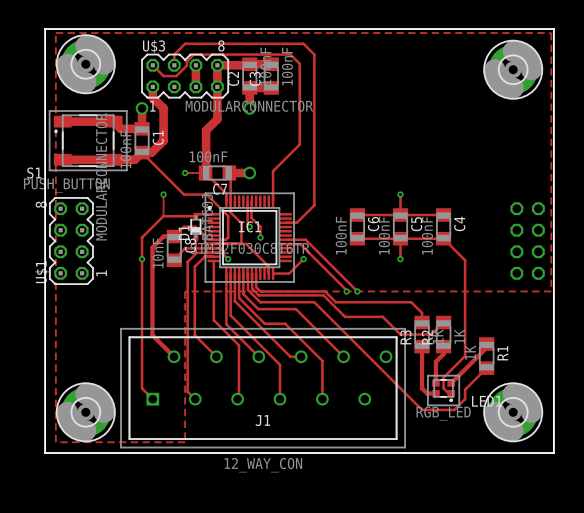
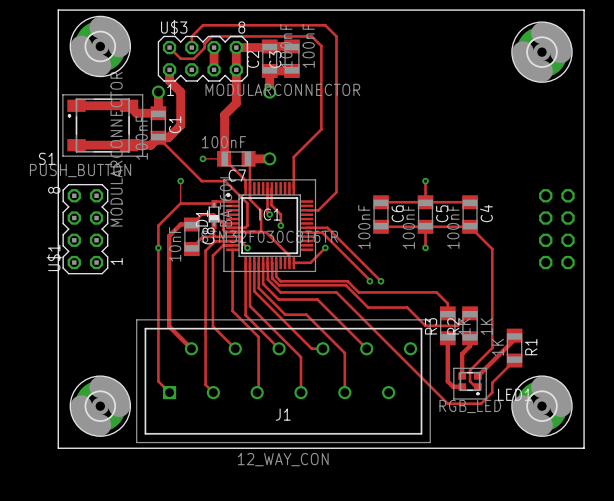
zone outline: (55, 33) (551, 33) (551, 291) (185, 291) (185, 442) (55, 442) (55, 33) -> none

